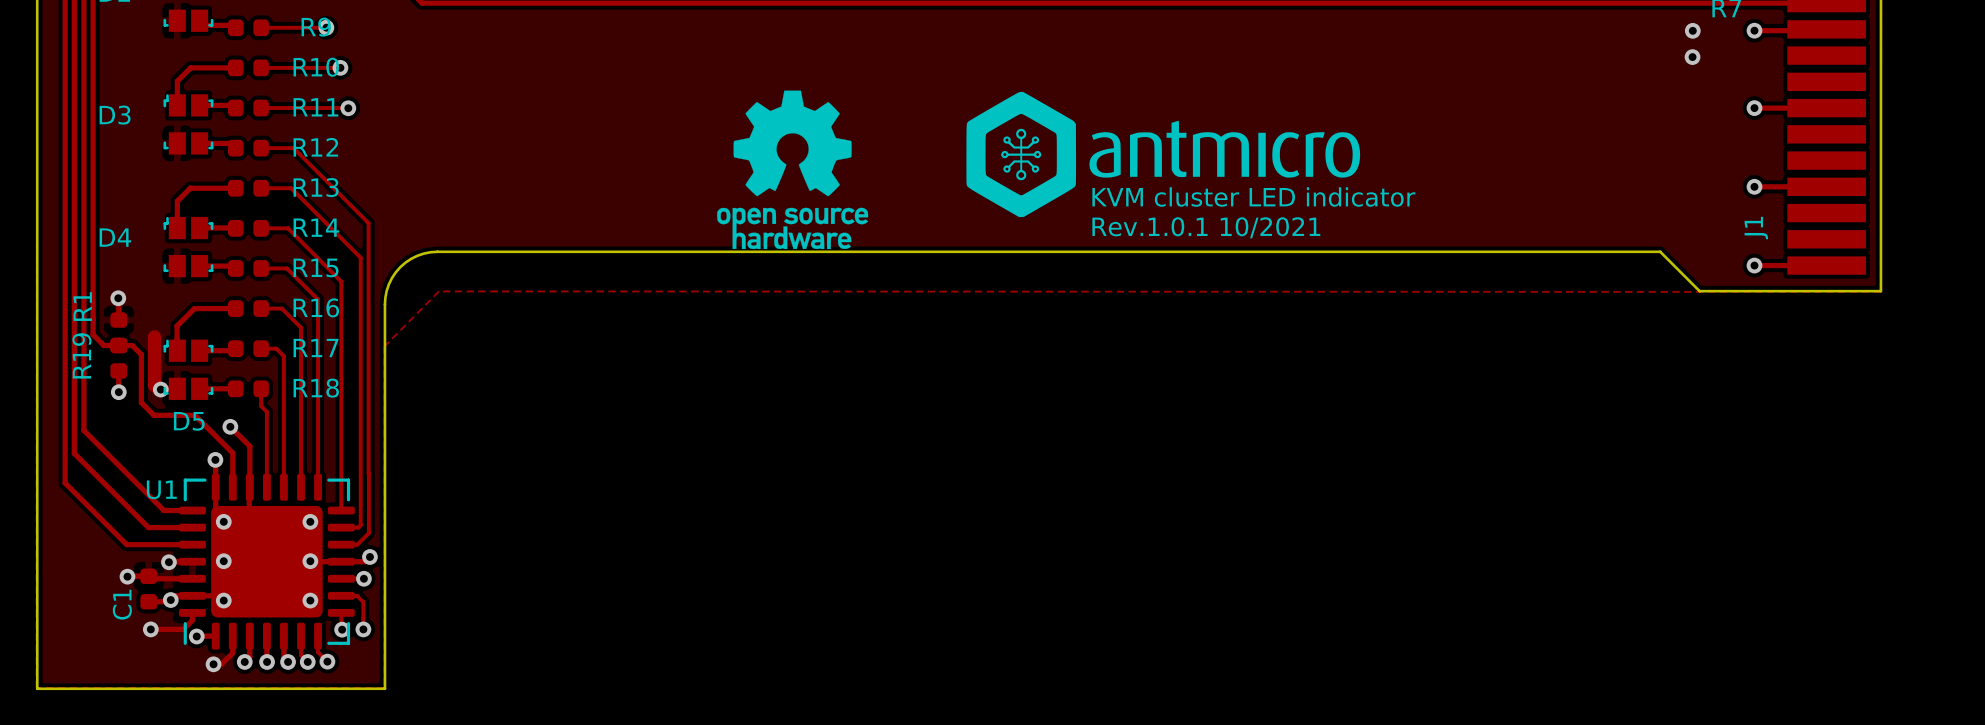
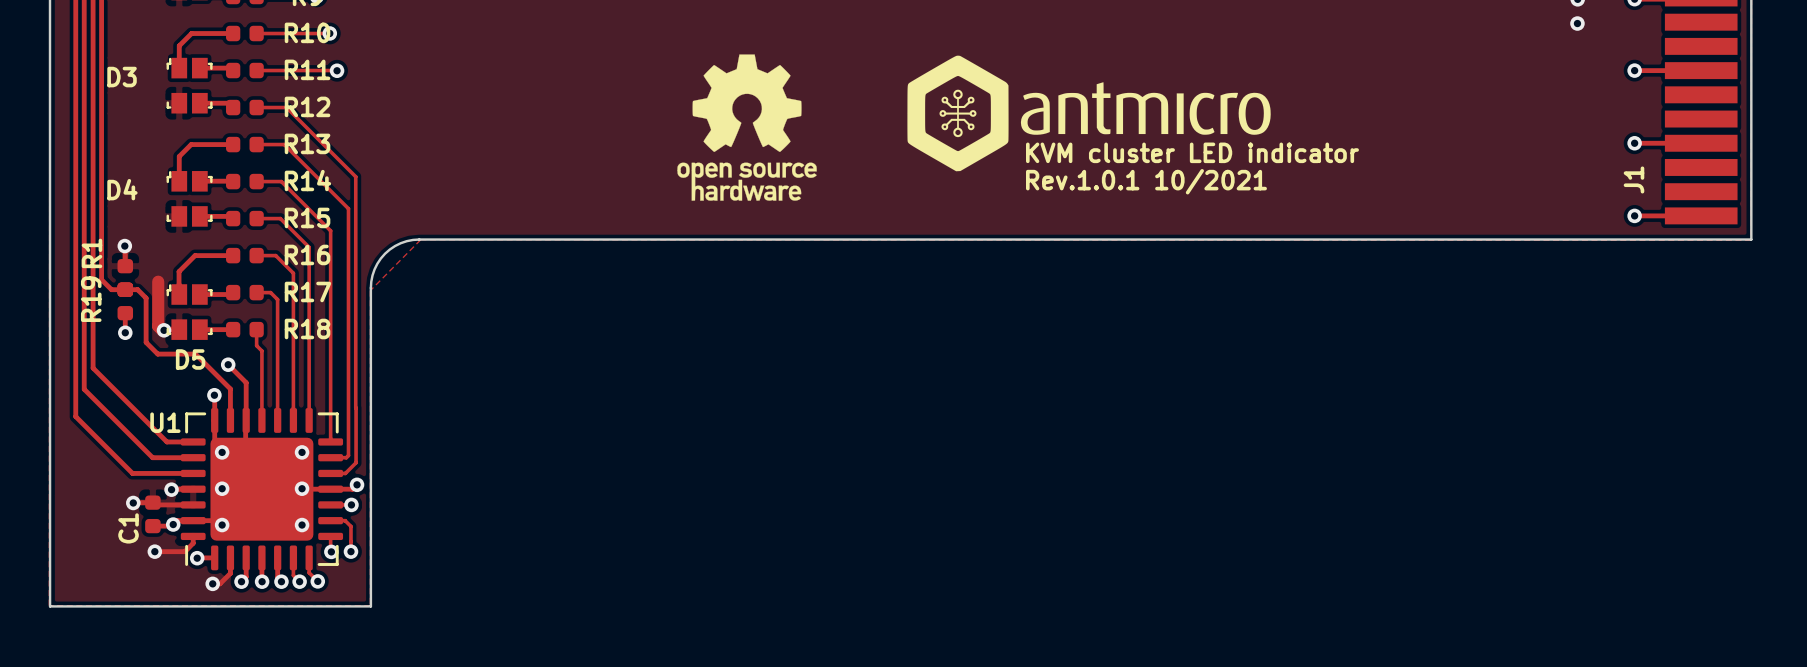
board edge: (1699, 291) (1660, 251) (437, 251) (423, 253) (411, 258) (400, 267) (391, 278) (385, 297) (384, 343) -> (1584, 239) (419, 239) (400, 243) (385, 253) (374, 269) (370, 287)

